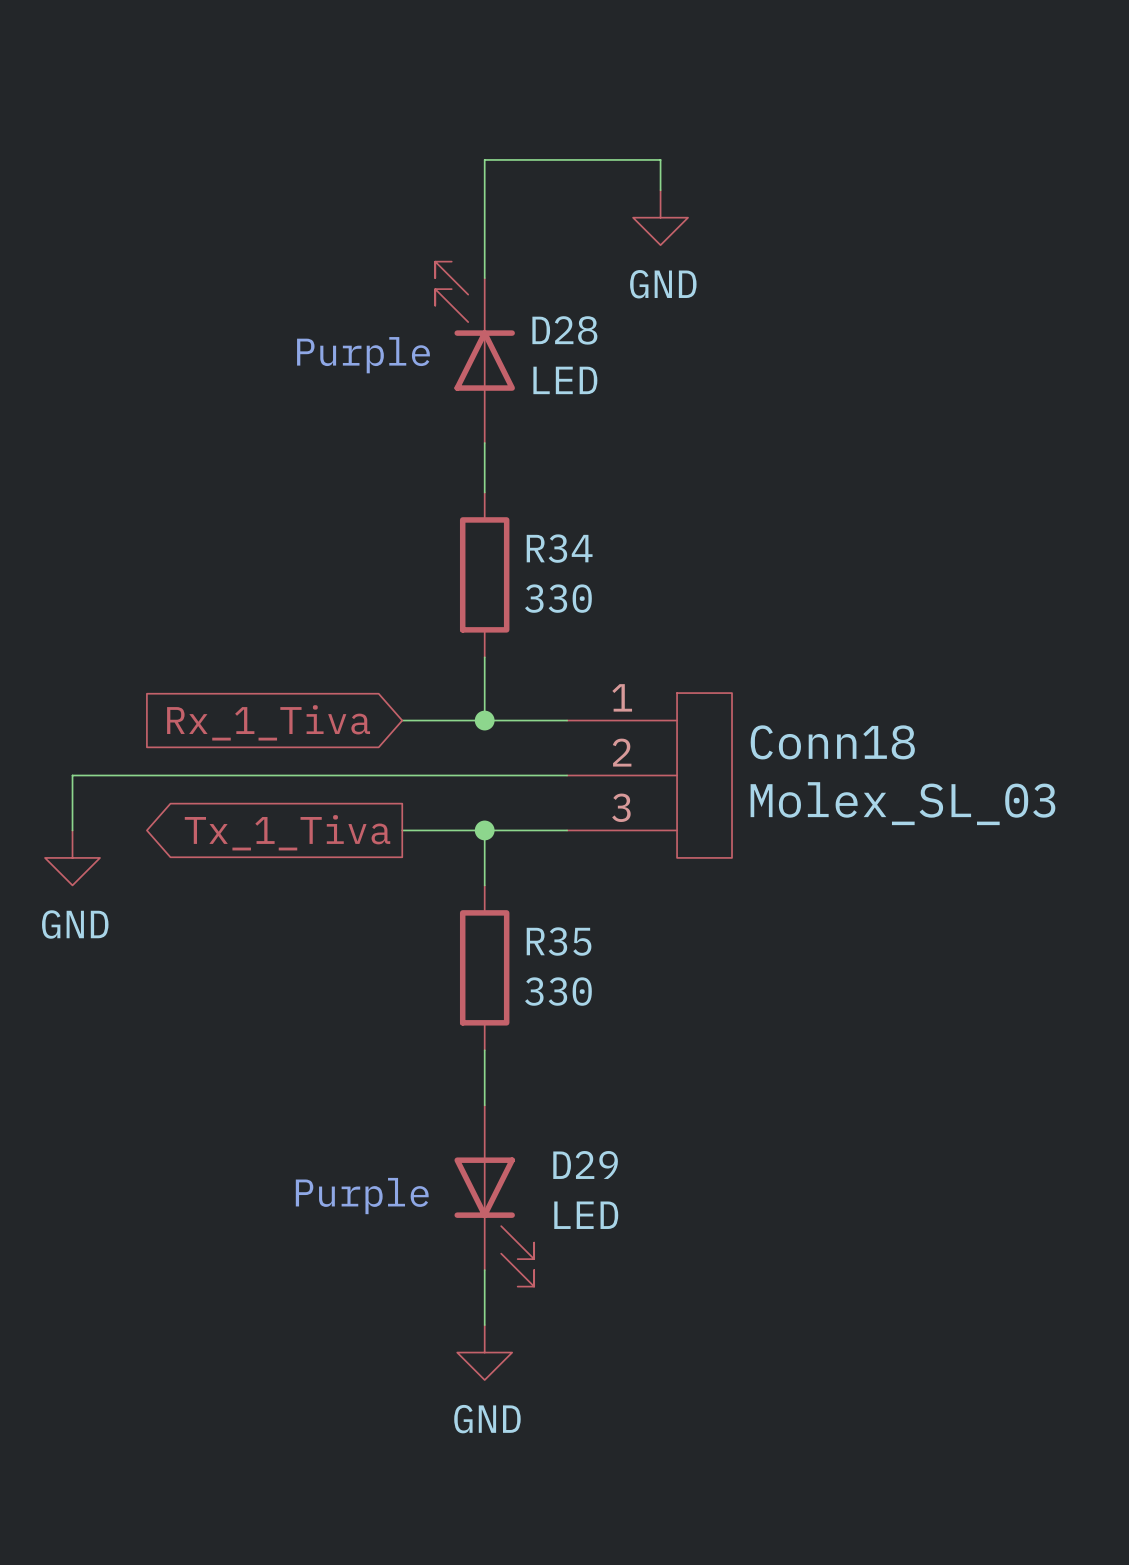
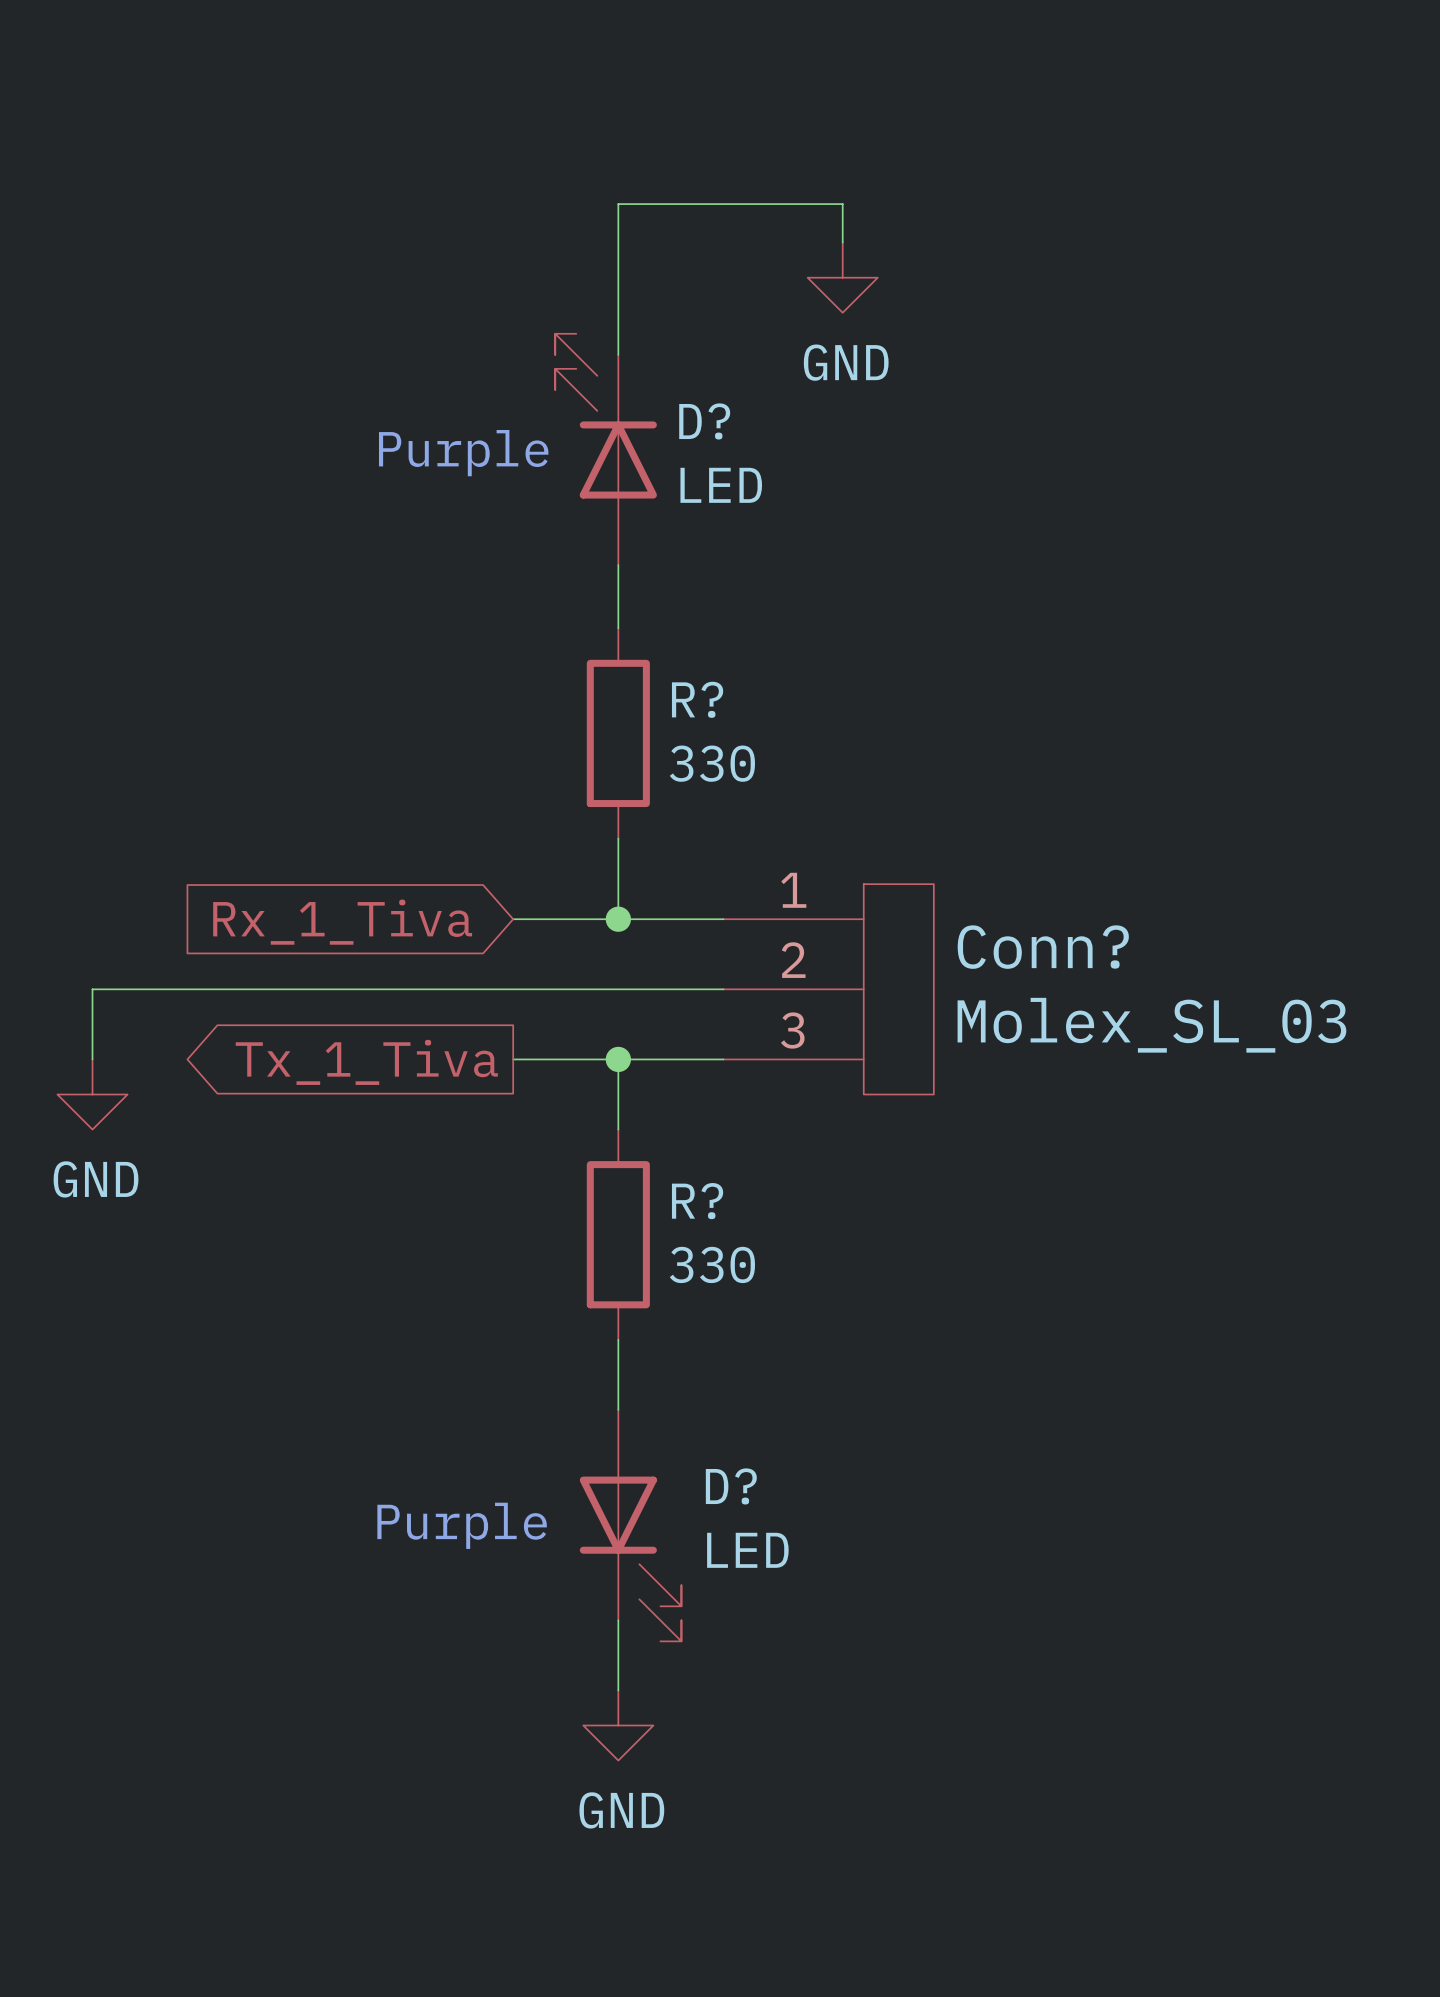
D28 name: D28 (564, 330) -> D? (704, 421)
R34 name: R34 (559, 548) -> R? (697, 699)
Conn18 name: Conn18 (832, 742) -> Conn? (1043, 947)
R35 name: R35 (559, 941) -> R? (697, 1201)
D29 name: D29 (585, 1164) -> D? (731, 1486)

